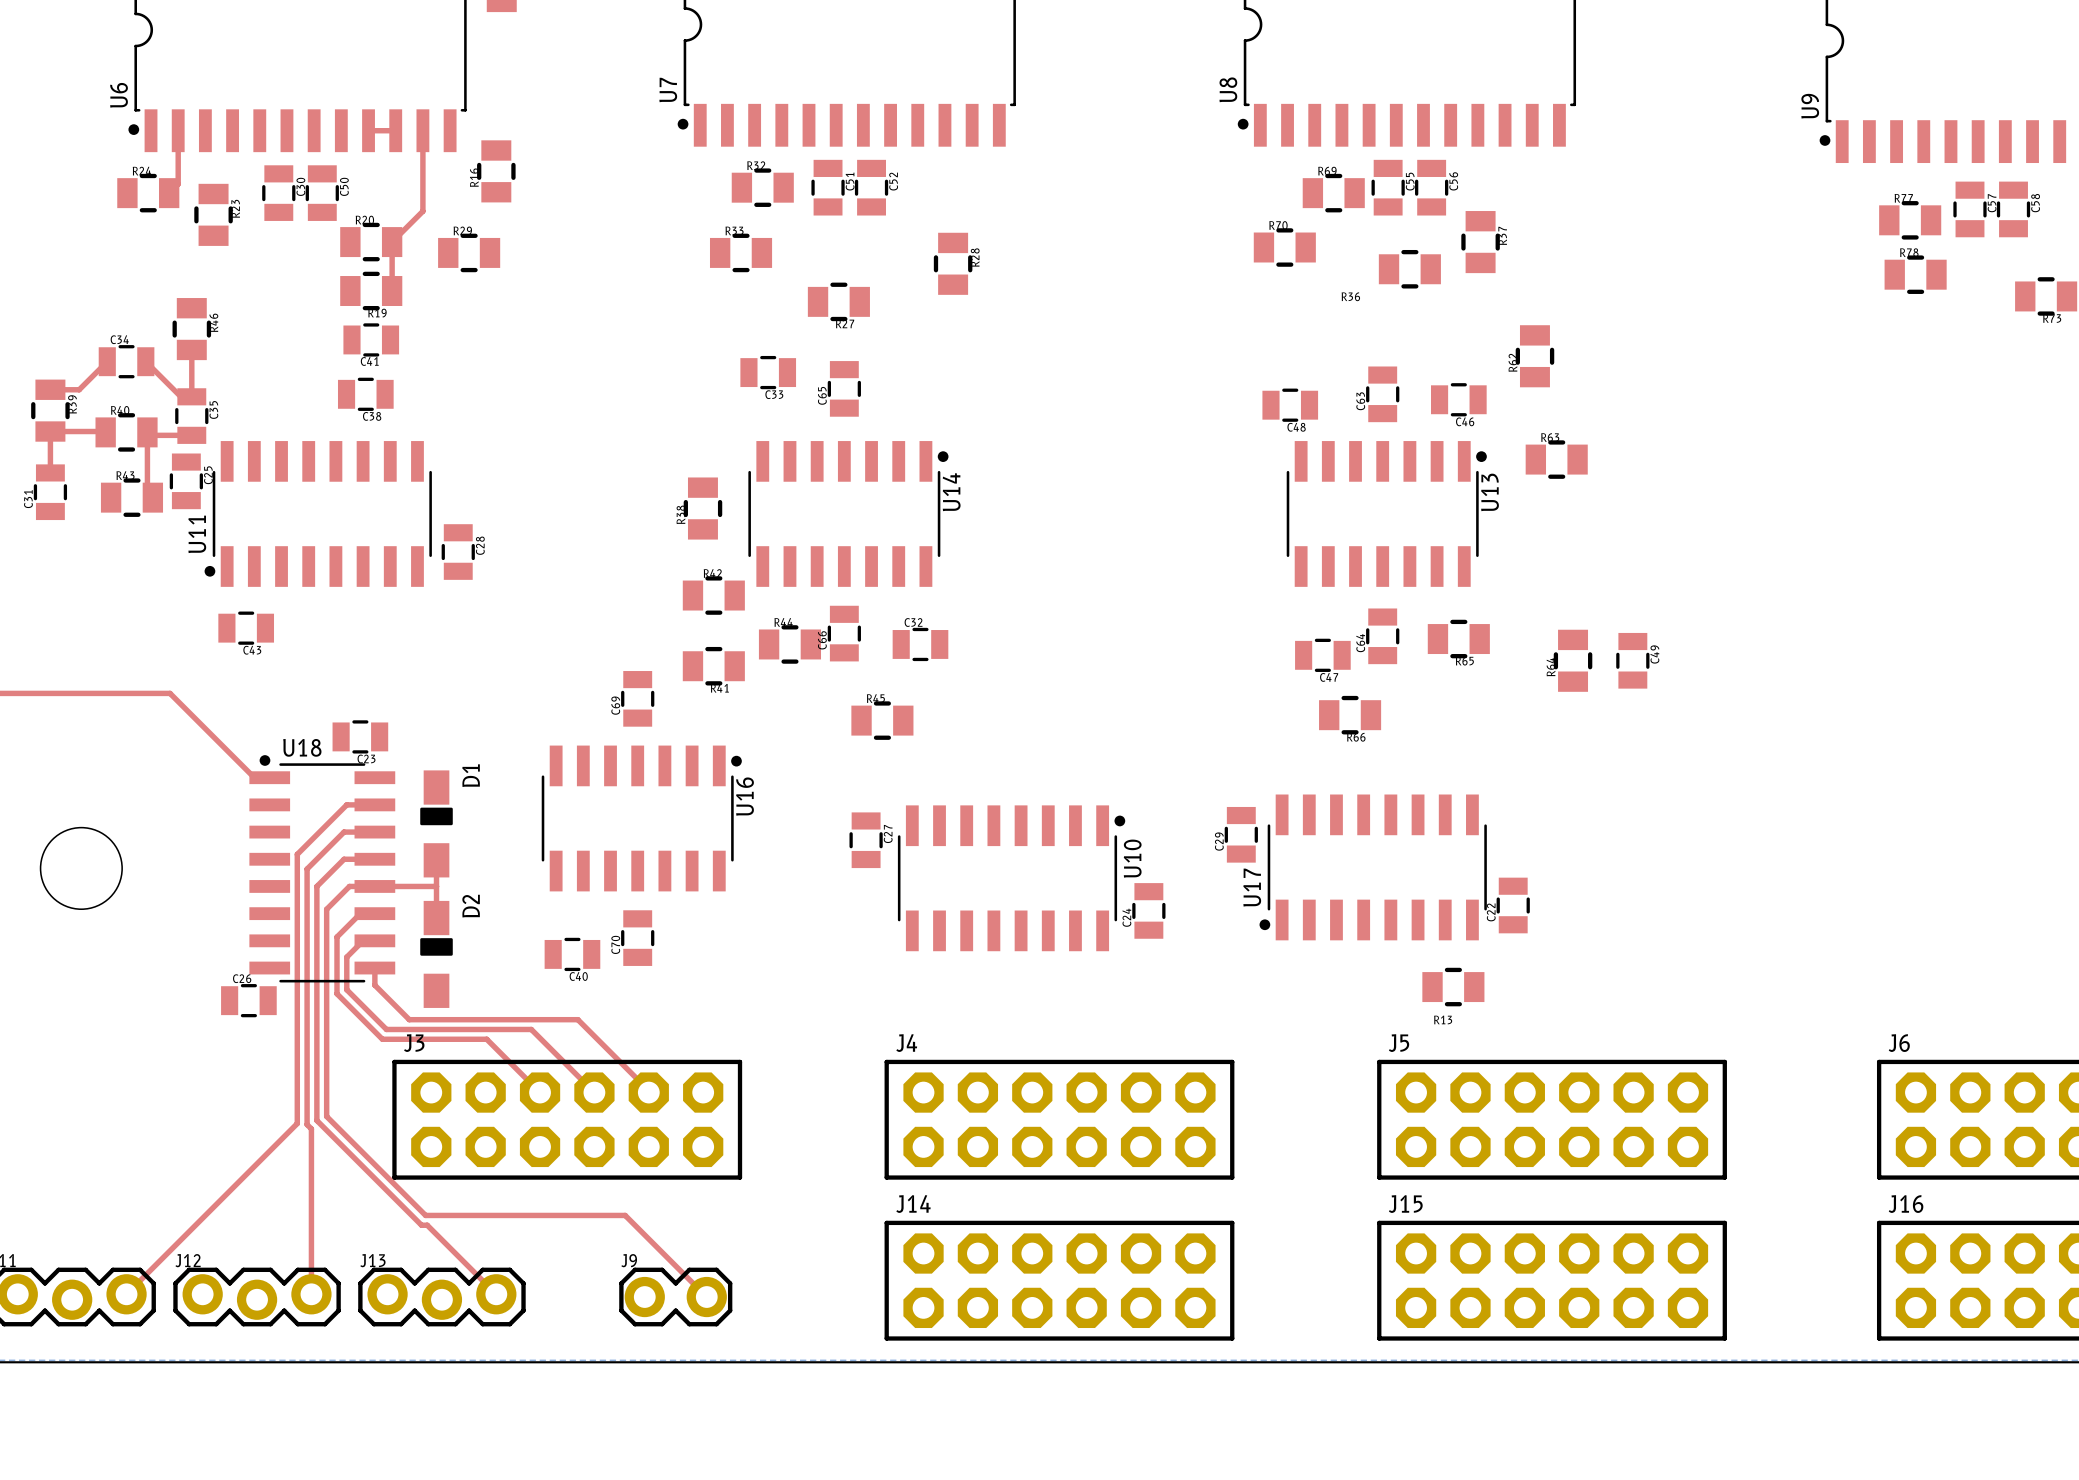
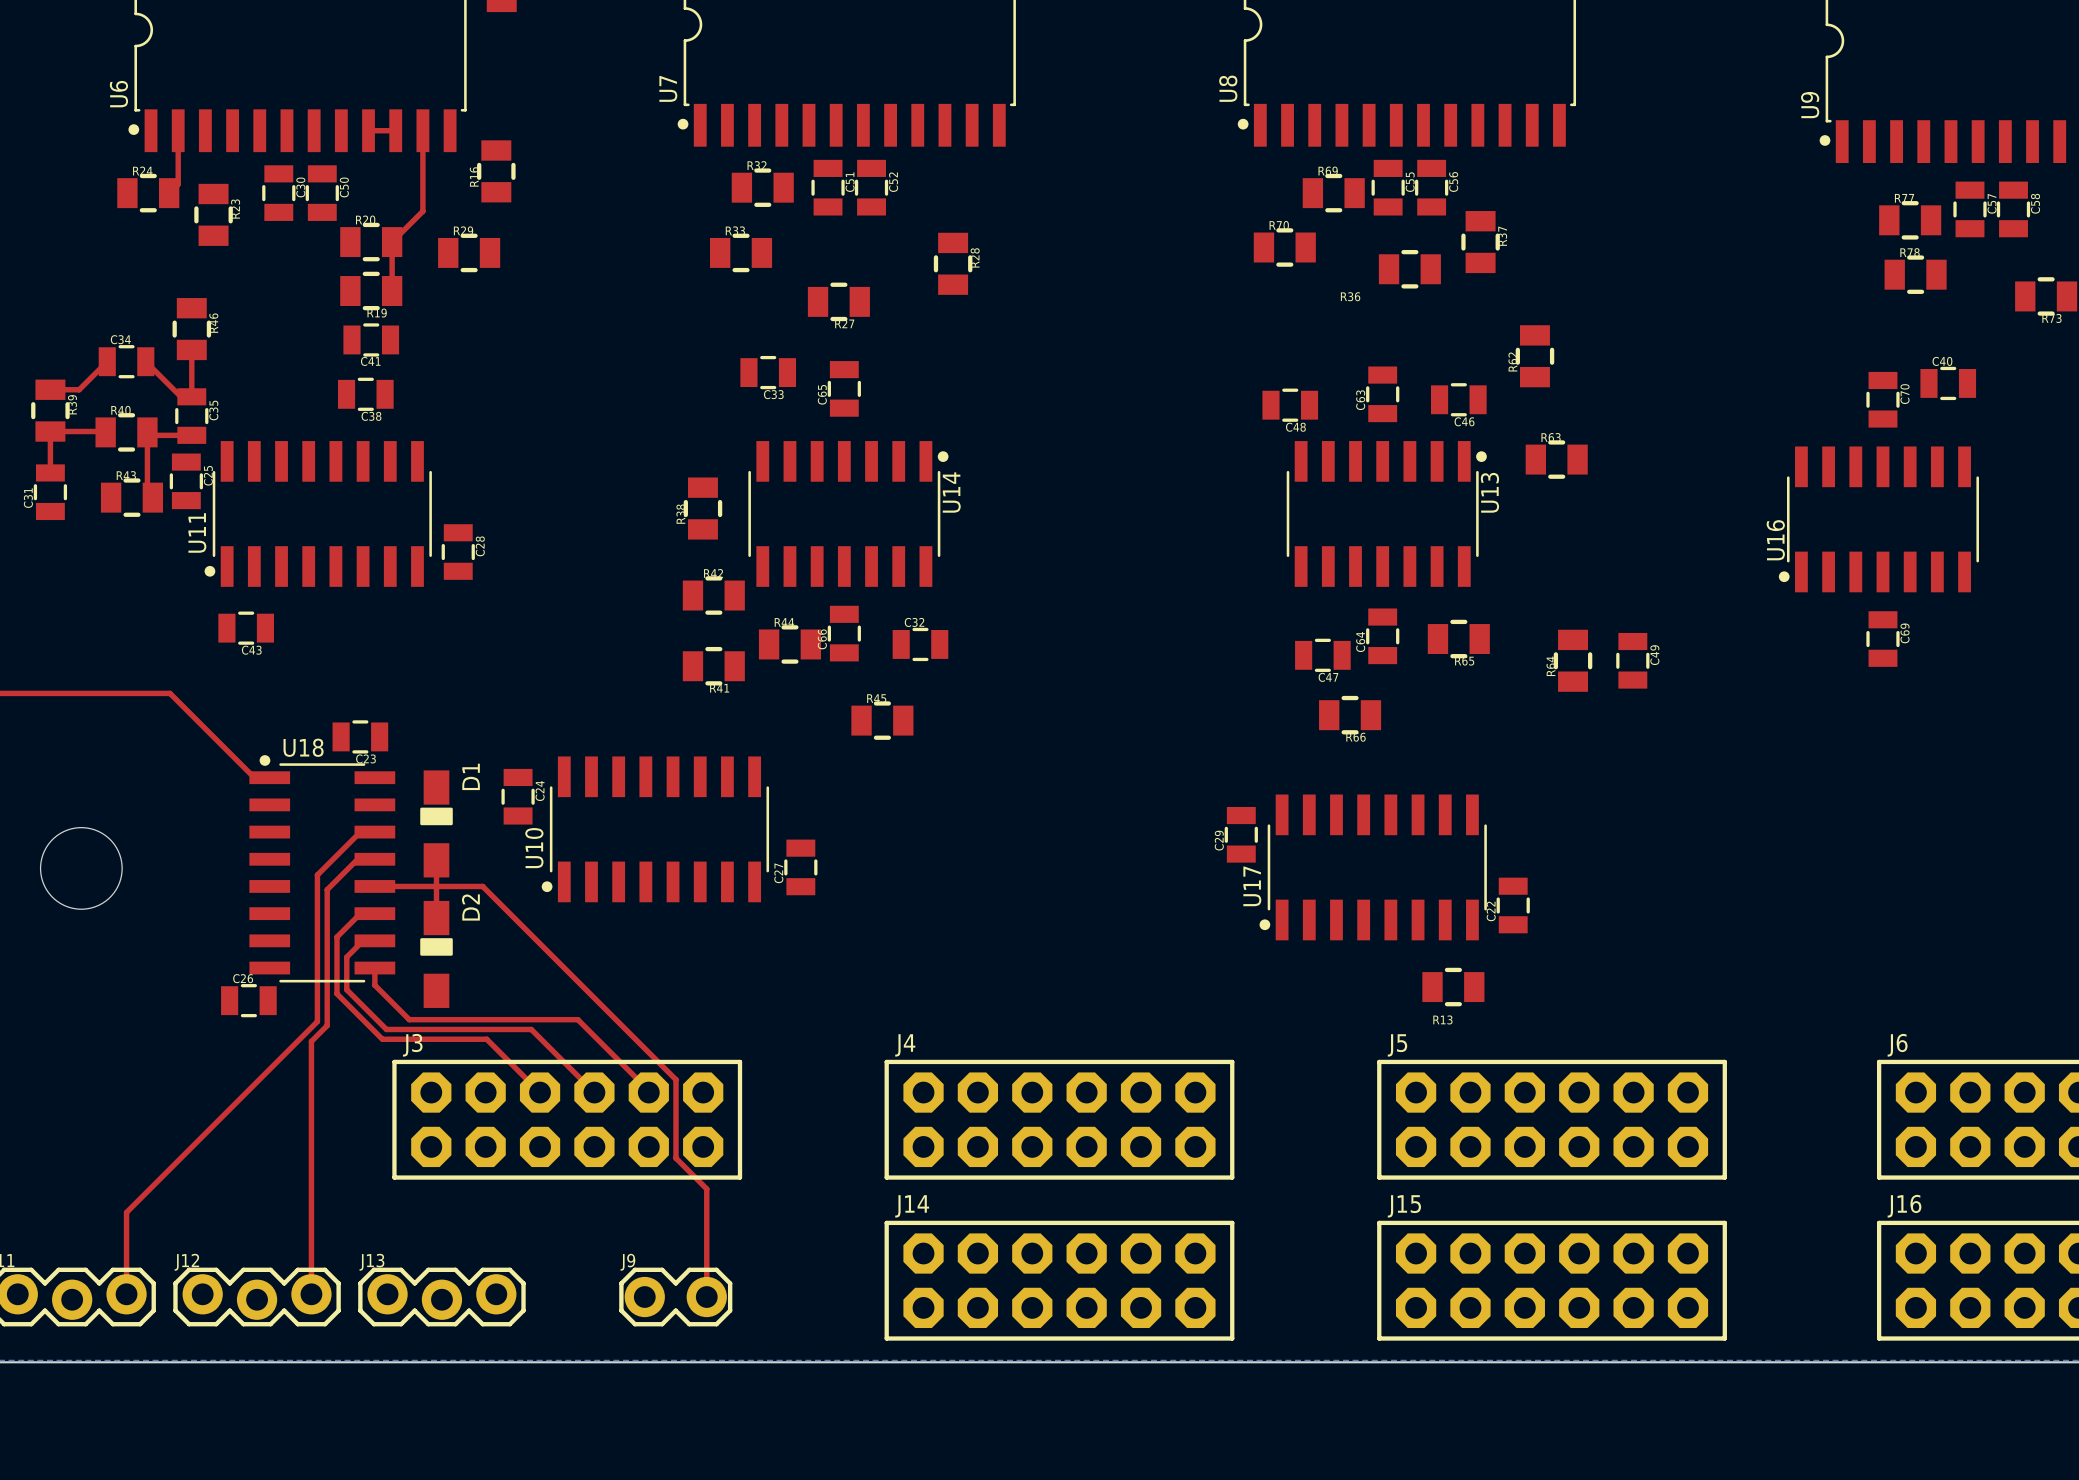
C69 position: (637, 698) -> (1882, 639)
C69 name position: C69 (615, 705) -> C69 (1905, 633)
top track: (374, 804) (346, 804) (297, 854) (297, 1123) (126, 1294) -> (360, 832) (317, 875) (317, 1021) (126, 1212) (126, 1294)
U16 rotation: 0° (641, 818) -> 180° (1878, 519)
U16 position: (641, 818) -> (1878, 519)
top track: (374, 832) (344, 832) (307, 869) (307, 1124) (311, 1128) -> (357, 859) (327, 889) (327, 1025) (311, 1041) (311, 1128)
C27 name position: C27 (888, 833) -> C27 (778, 873)
C27 position: (866, 840) -> (800, 867)
top track: (374, 859) (344, 859) (316, 886) (316, 1120) (421, 1225) (427, 1225) (496, 1294) -> none
U10 rotation: 0° (1011, 878) -> 180° (655, 829)
U10 position: (1011, 878) -> (655, 829)
top track: (374, 886) (349, 886) (326, 909) (326, 1116) (425, 1215) (625, 1215) (706, 1297) -> (436, 886) (482, 886) (675, 1079) (675, 1158) (706, 1188) (706, 1297)
C24 position: (1148, 910) -> (518, 796)
C24 name position: C24 (1126, 917) -> C24 (540, 791)
C70 position: (637, 938) -> (1882, 399)
C70 name position: C70 (615, 944) -> C70 (1905, 394)
C40 position: (572, 954) -> (1948, 383)
C40 name position: C40 (578, 976) -> C40 (1942, 361)

